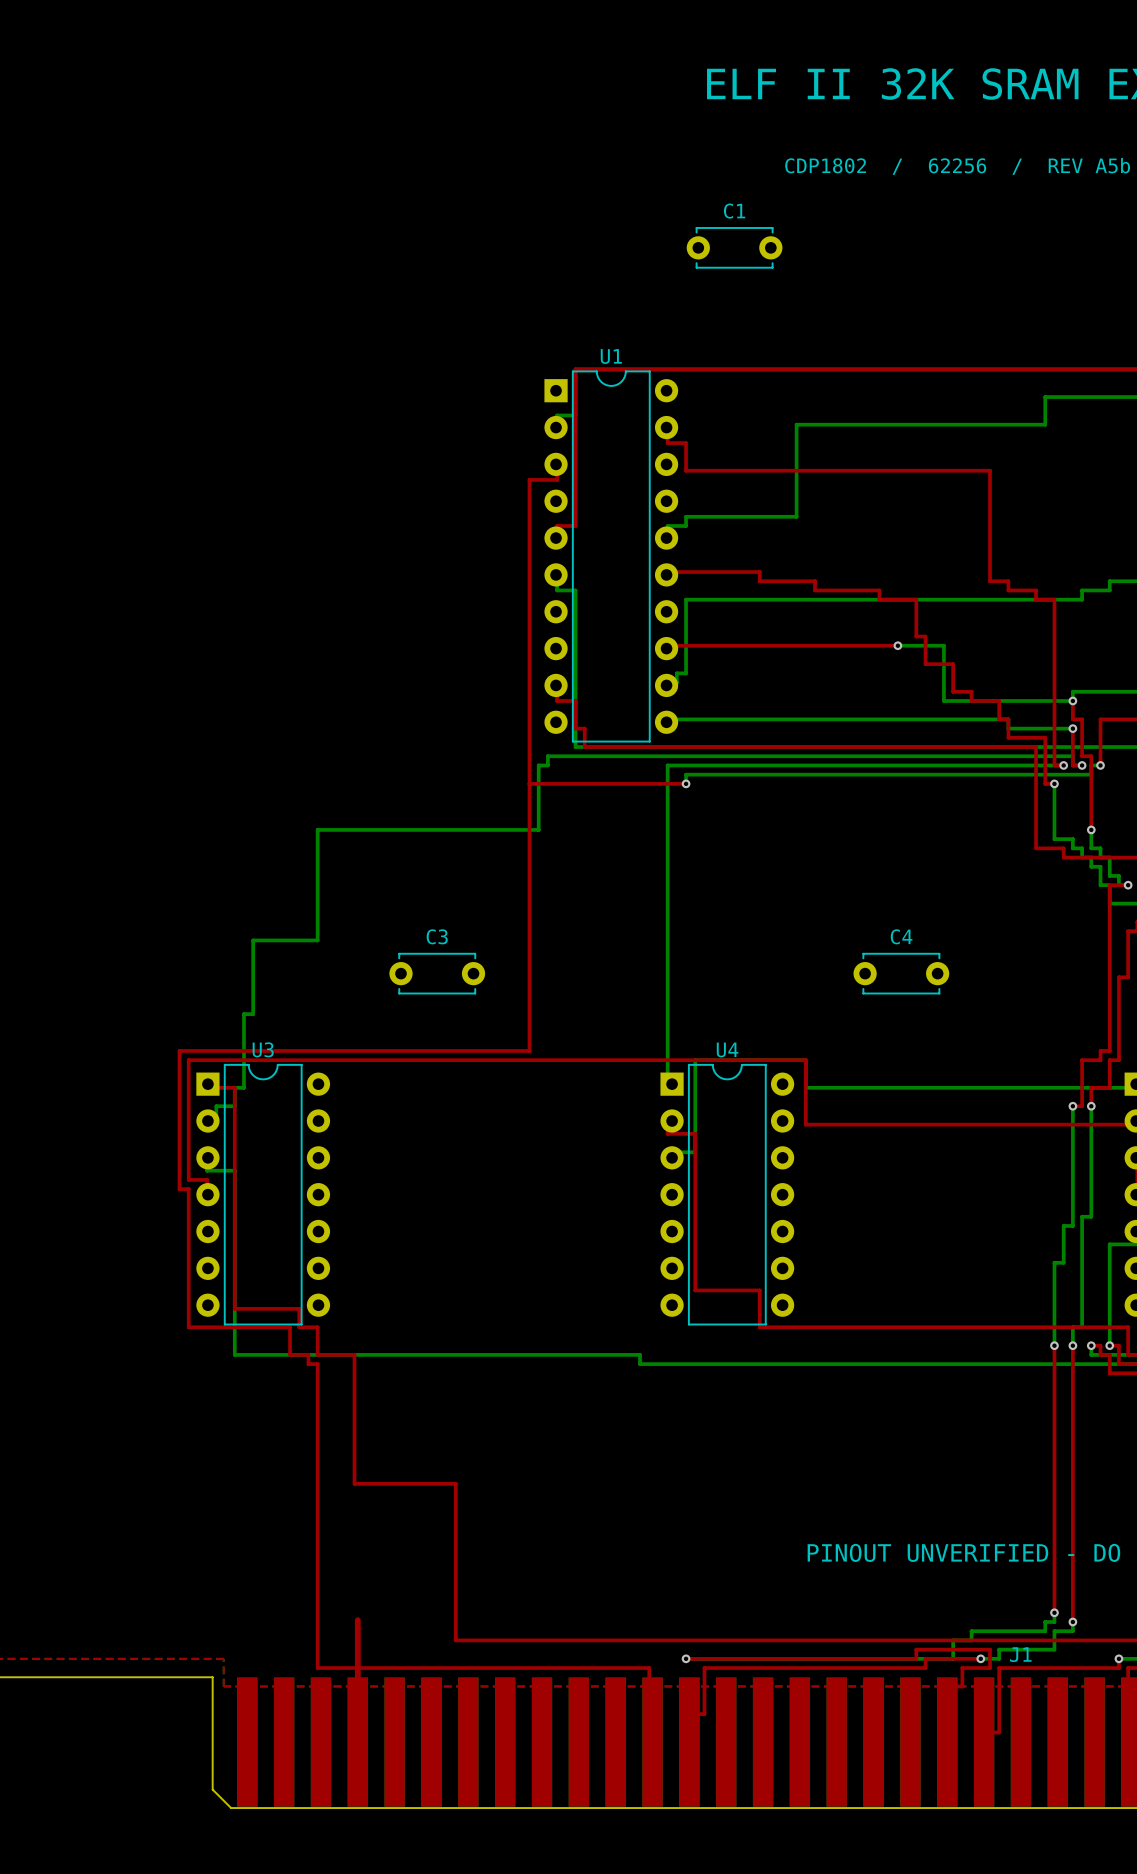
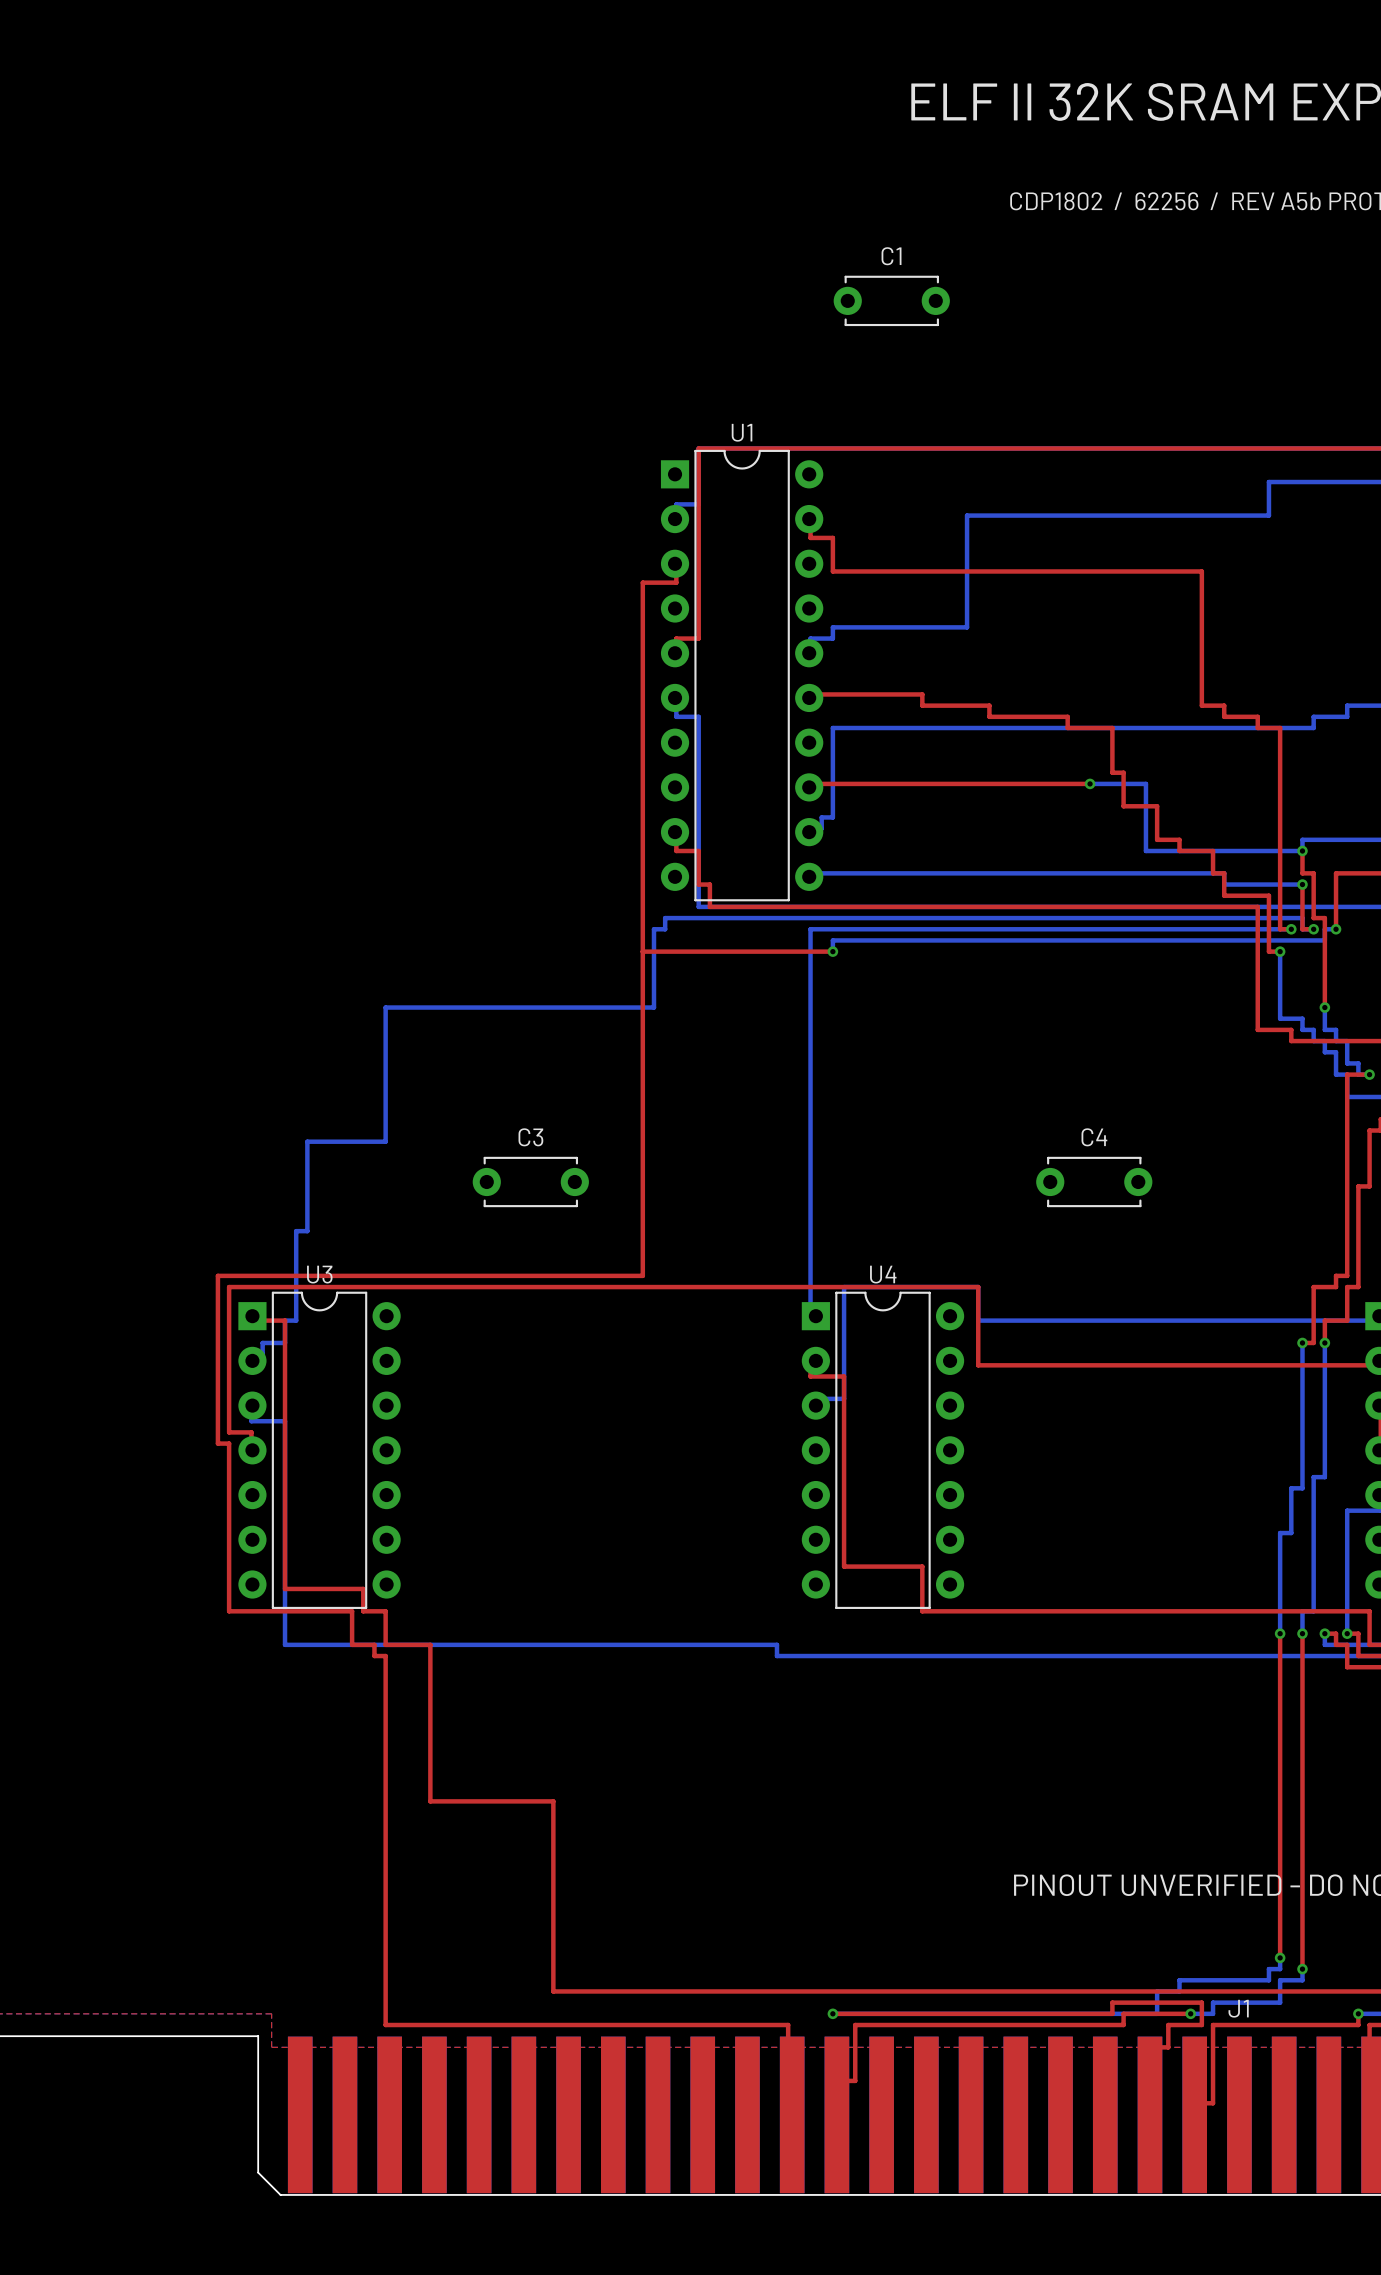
top track: (357, 1620) (357, 1742) -> none

